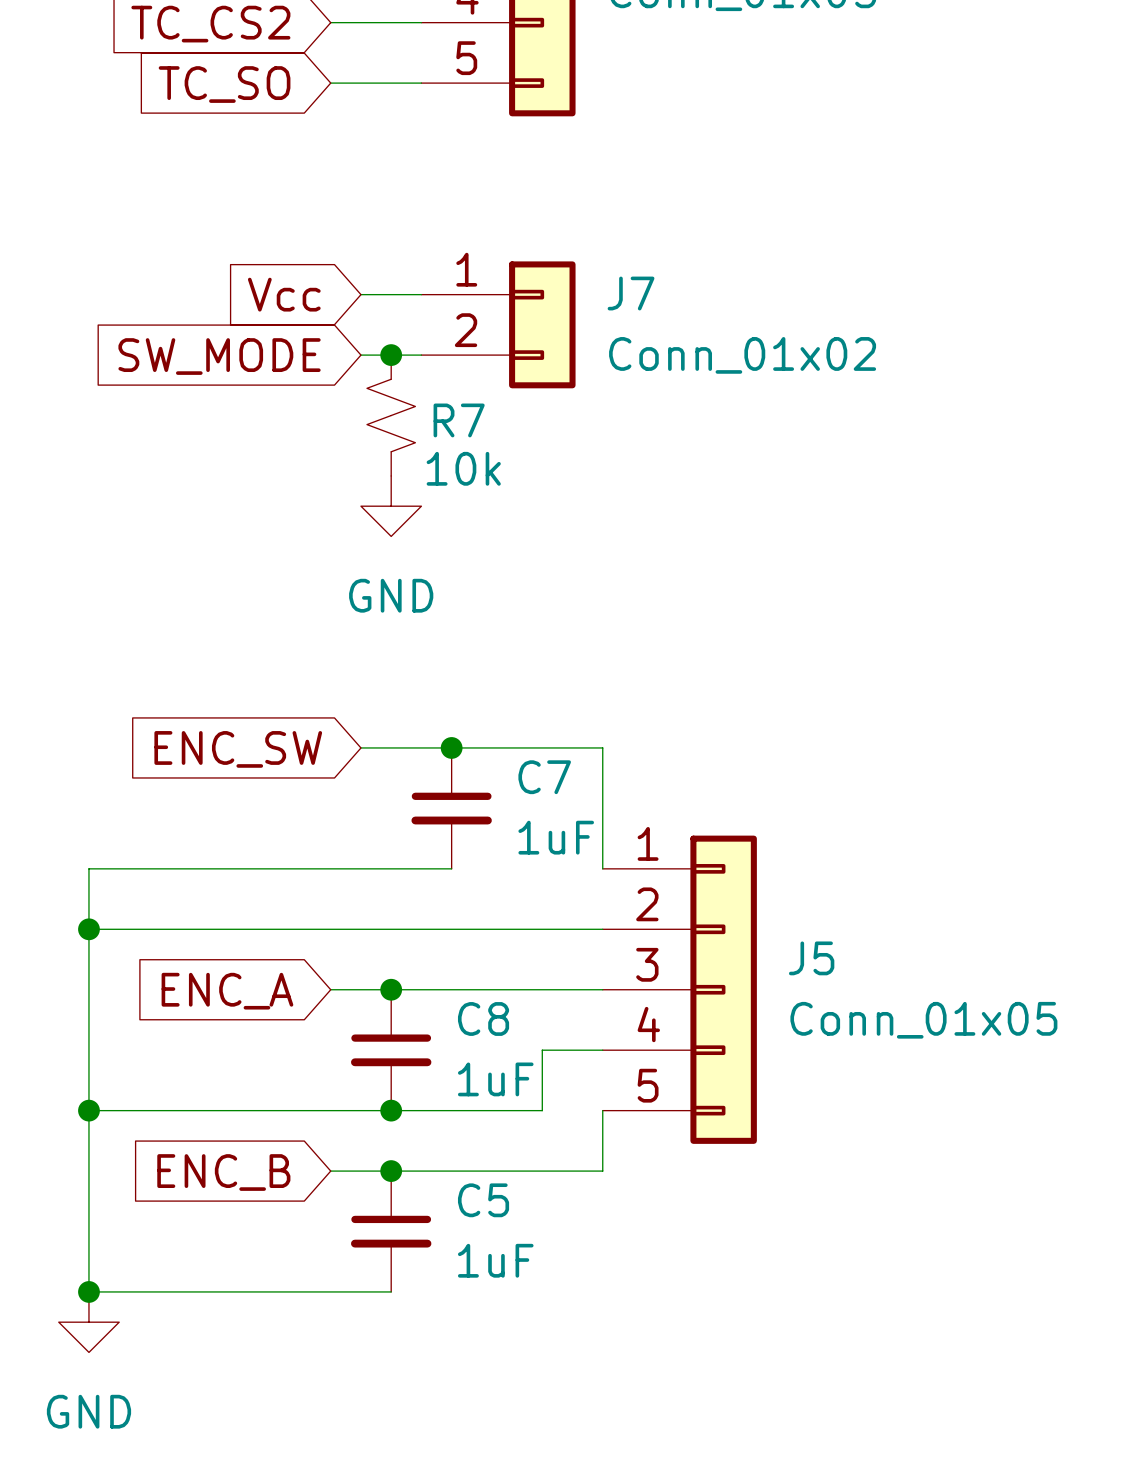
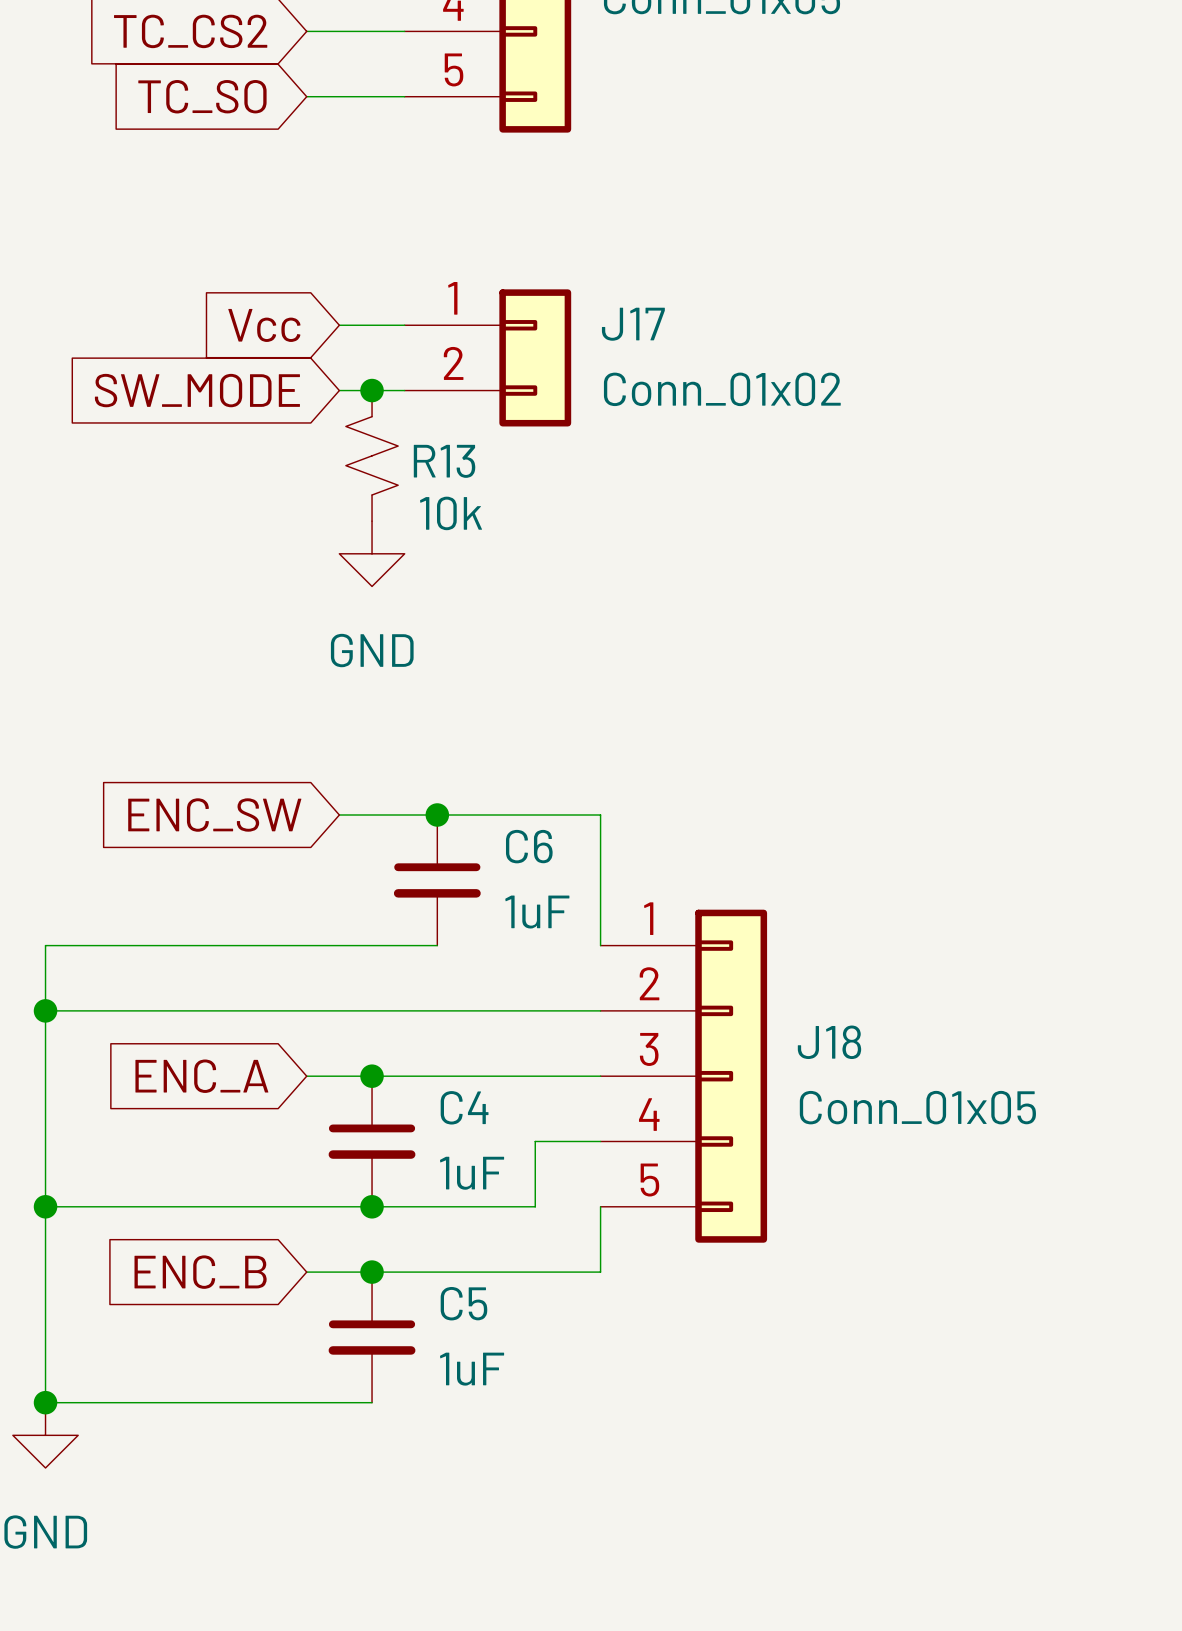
J7 name: J7 (631, 293) -> J17 (633, 324)
R7 name: R7 (459, 420) -> R13 (444, 461)
C7 name: C7 (544, 777) -> C6 (529, 846)
J5 name: J5 (811, 958) -> J18 (829, 1042)
C8 name: C8 (483, 1018) -> C4 (464, 1107)

